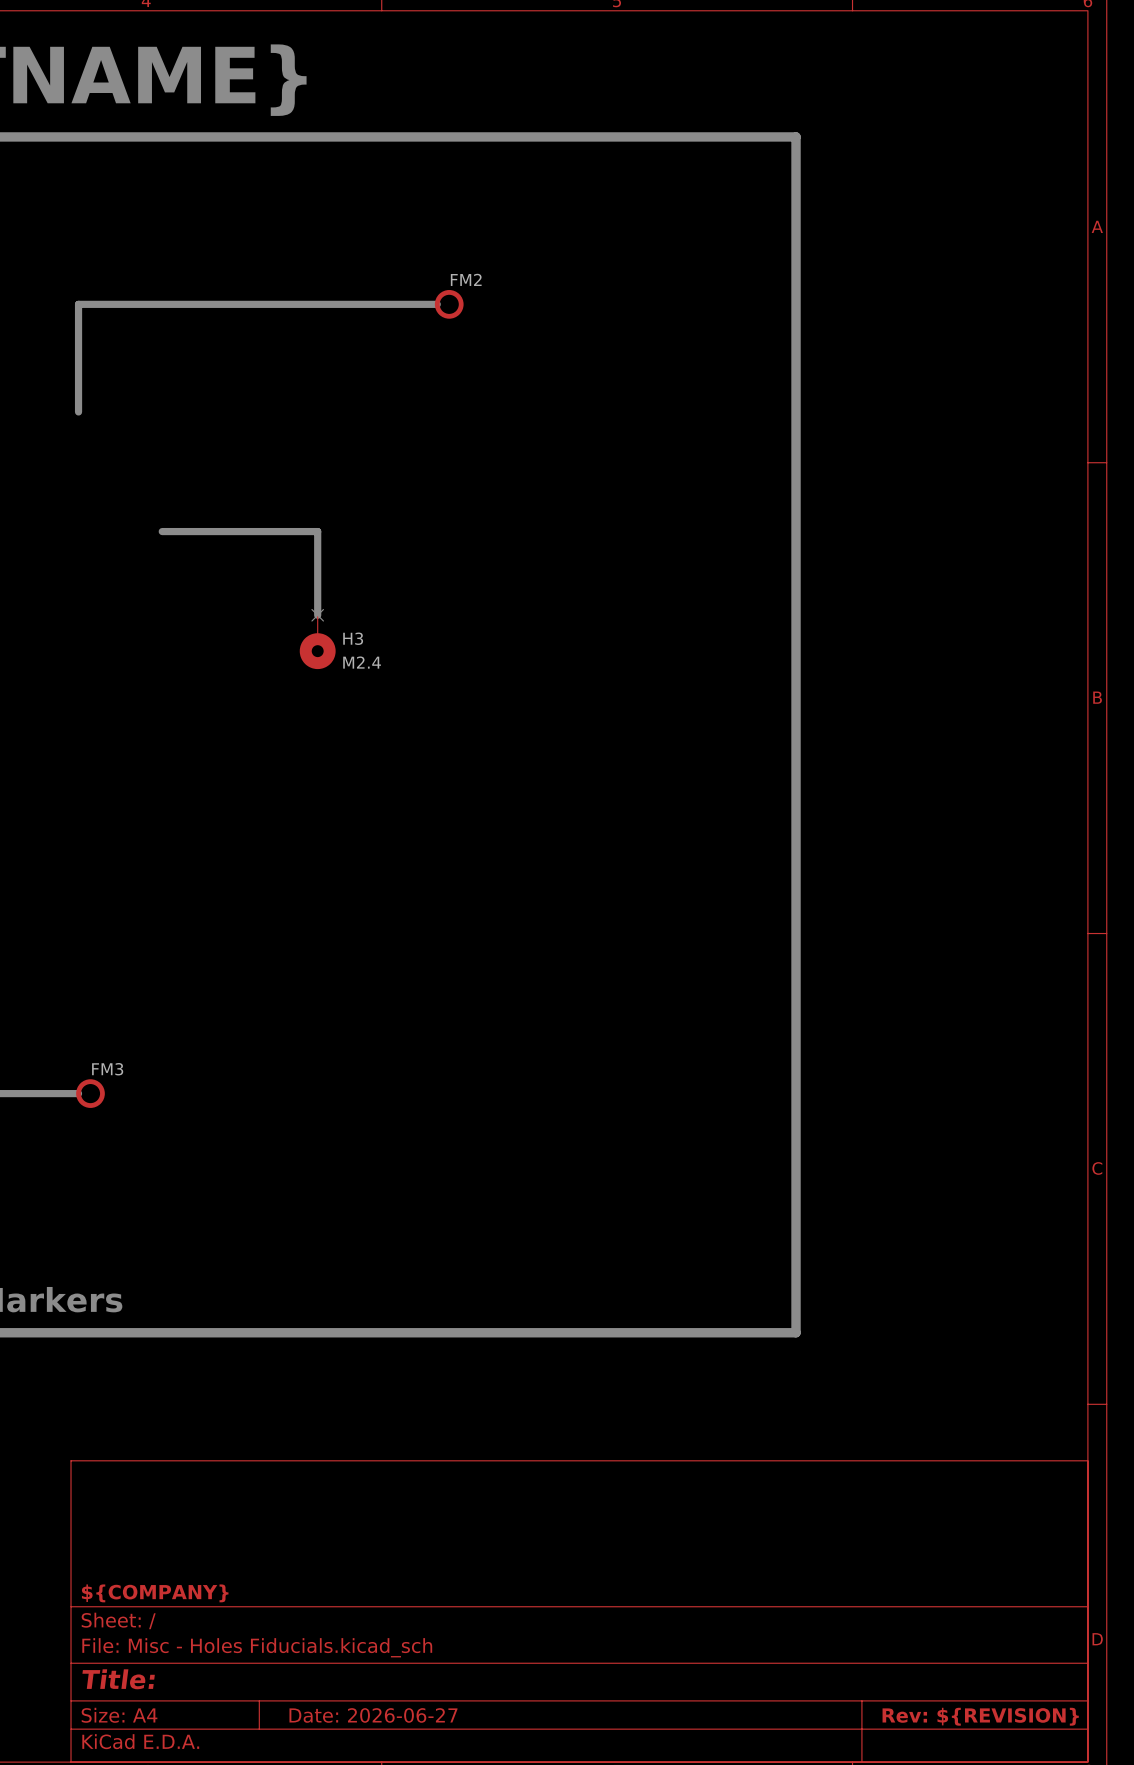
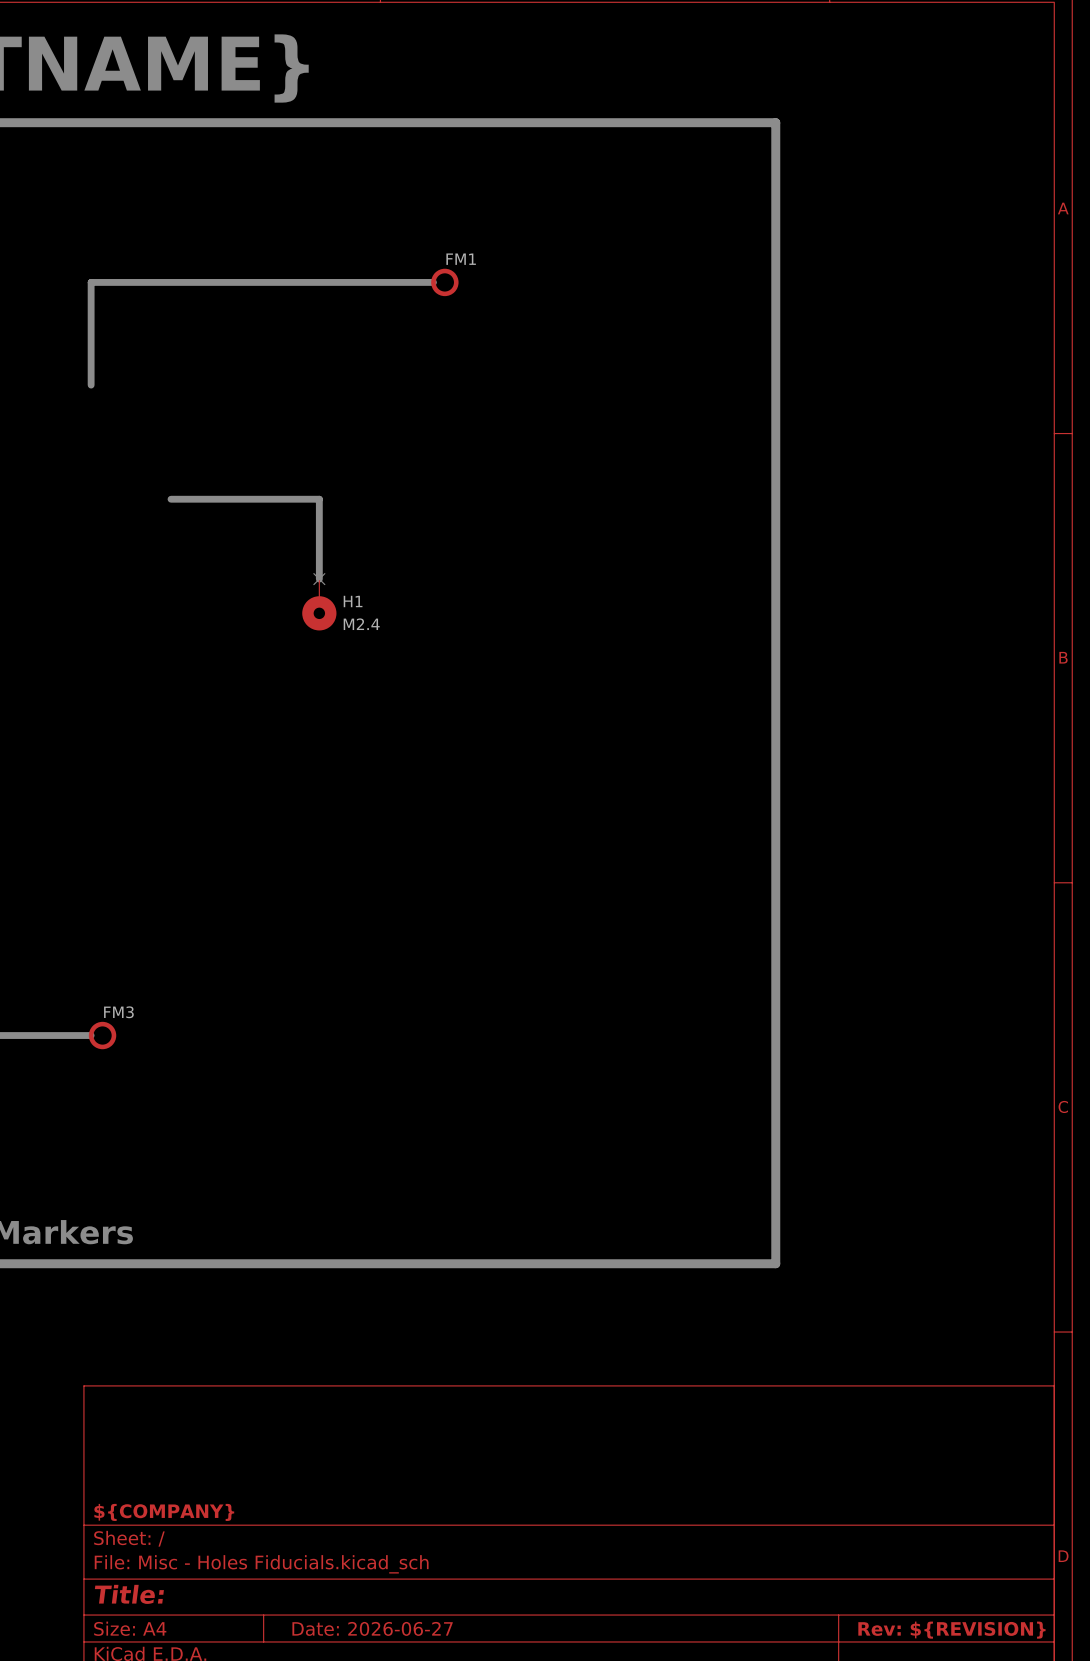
FM2 name: FM2 (466, 279) -> FM1 (461, 259)
H3 name: H3 (353, 638) -> H1 (353, 601)

